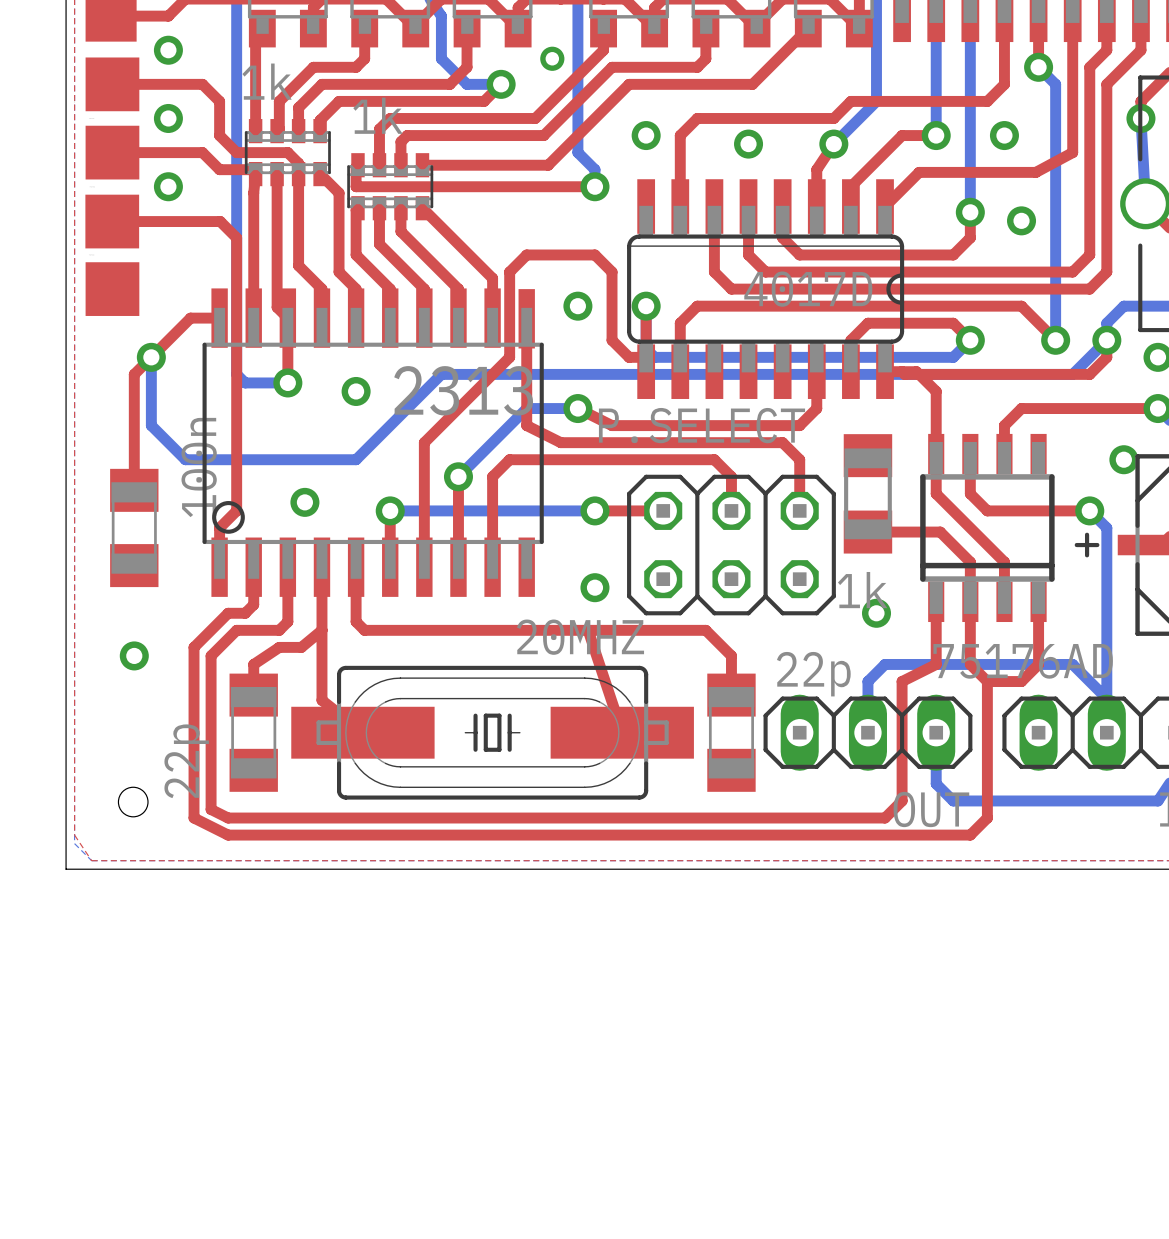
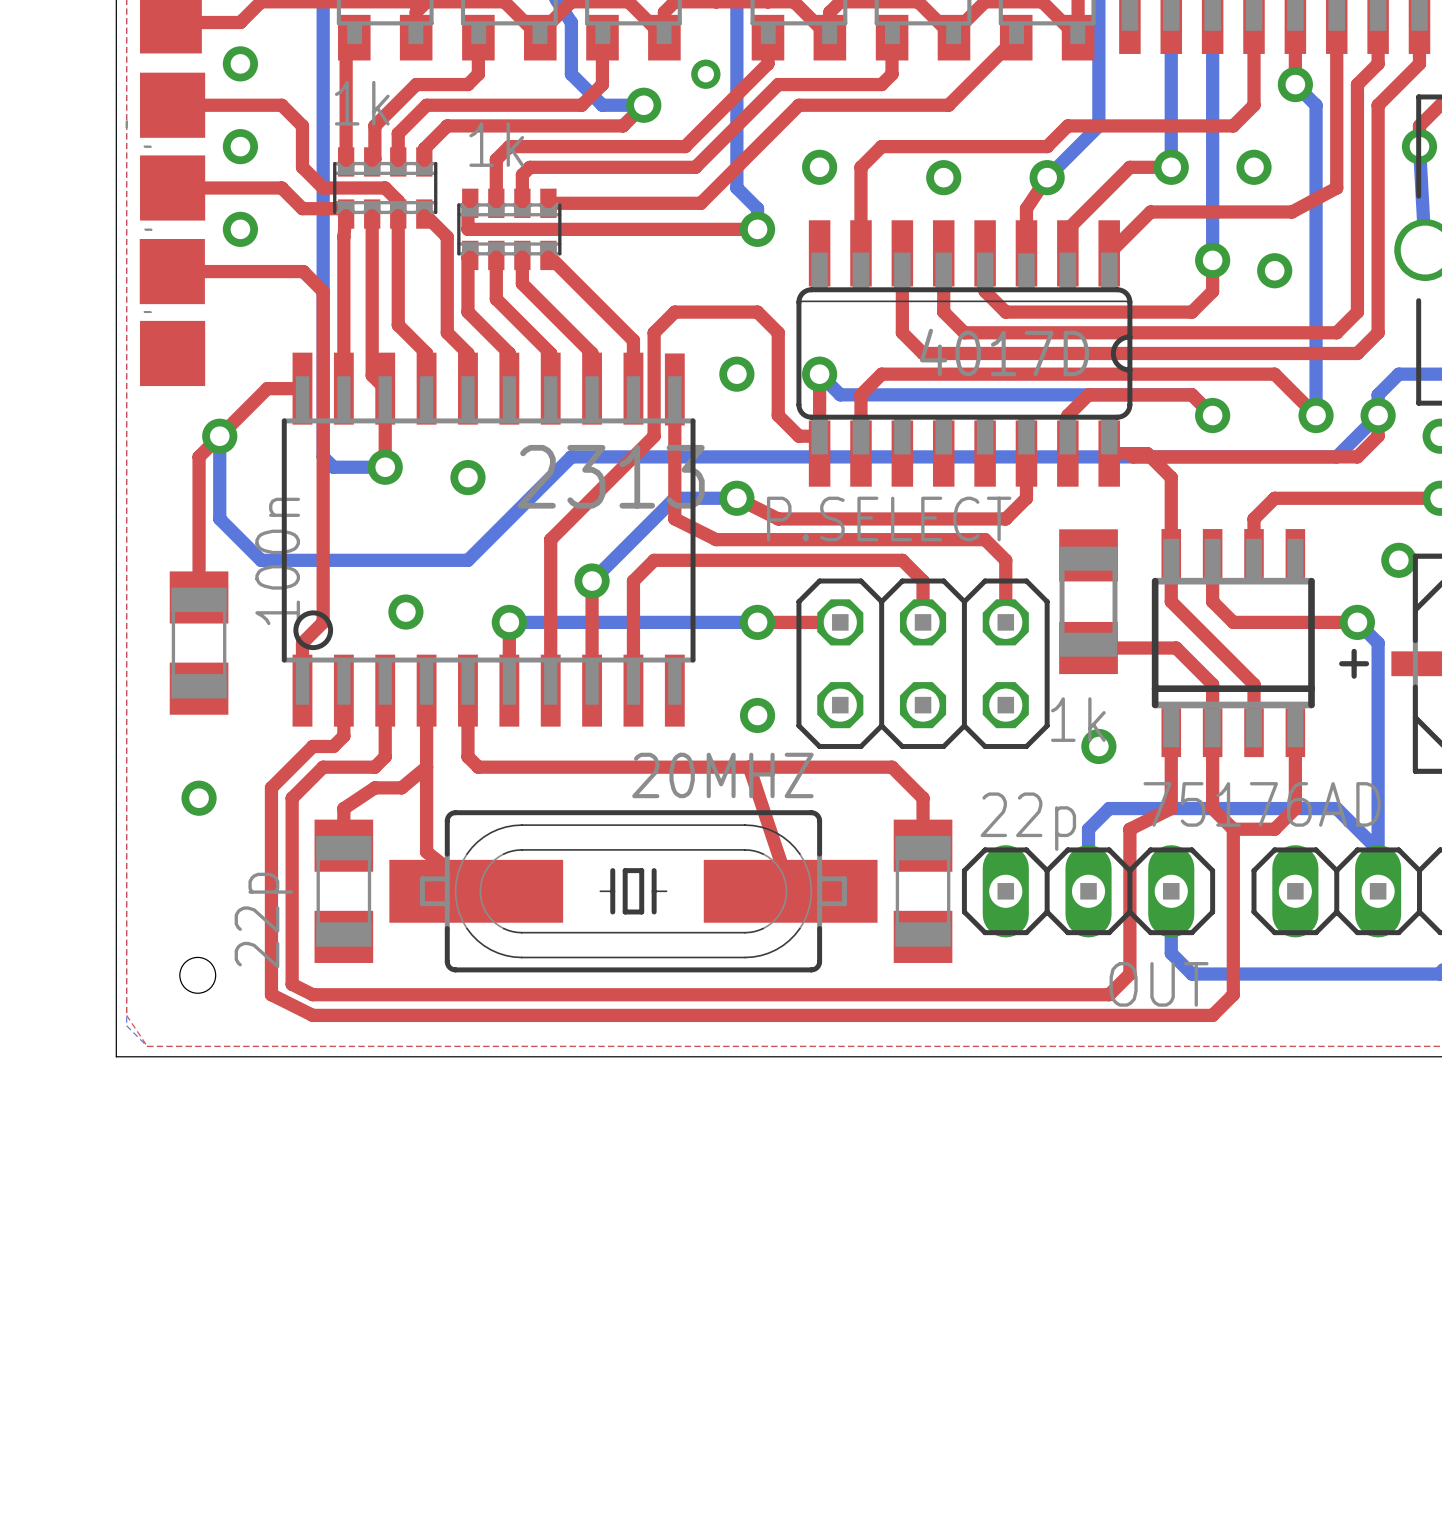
bottom track: (646, 306) (646, 348) (654, 357) (953, 357) (970, 340) -> (819, 374) (840, 394) (1191, 394) (1212, 415)

